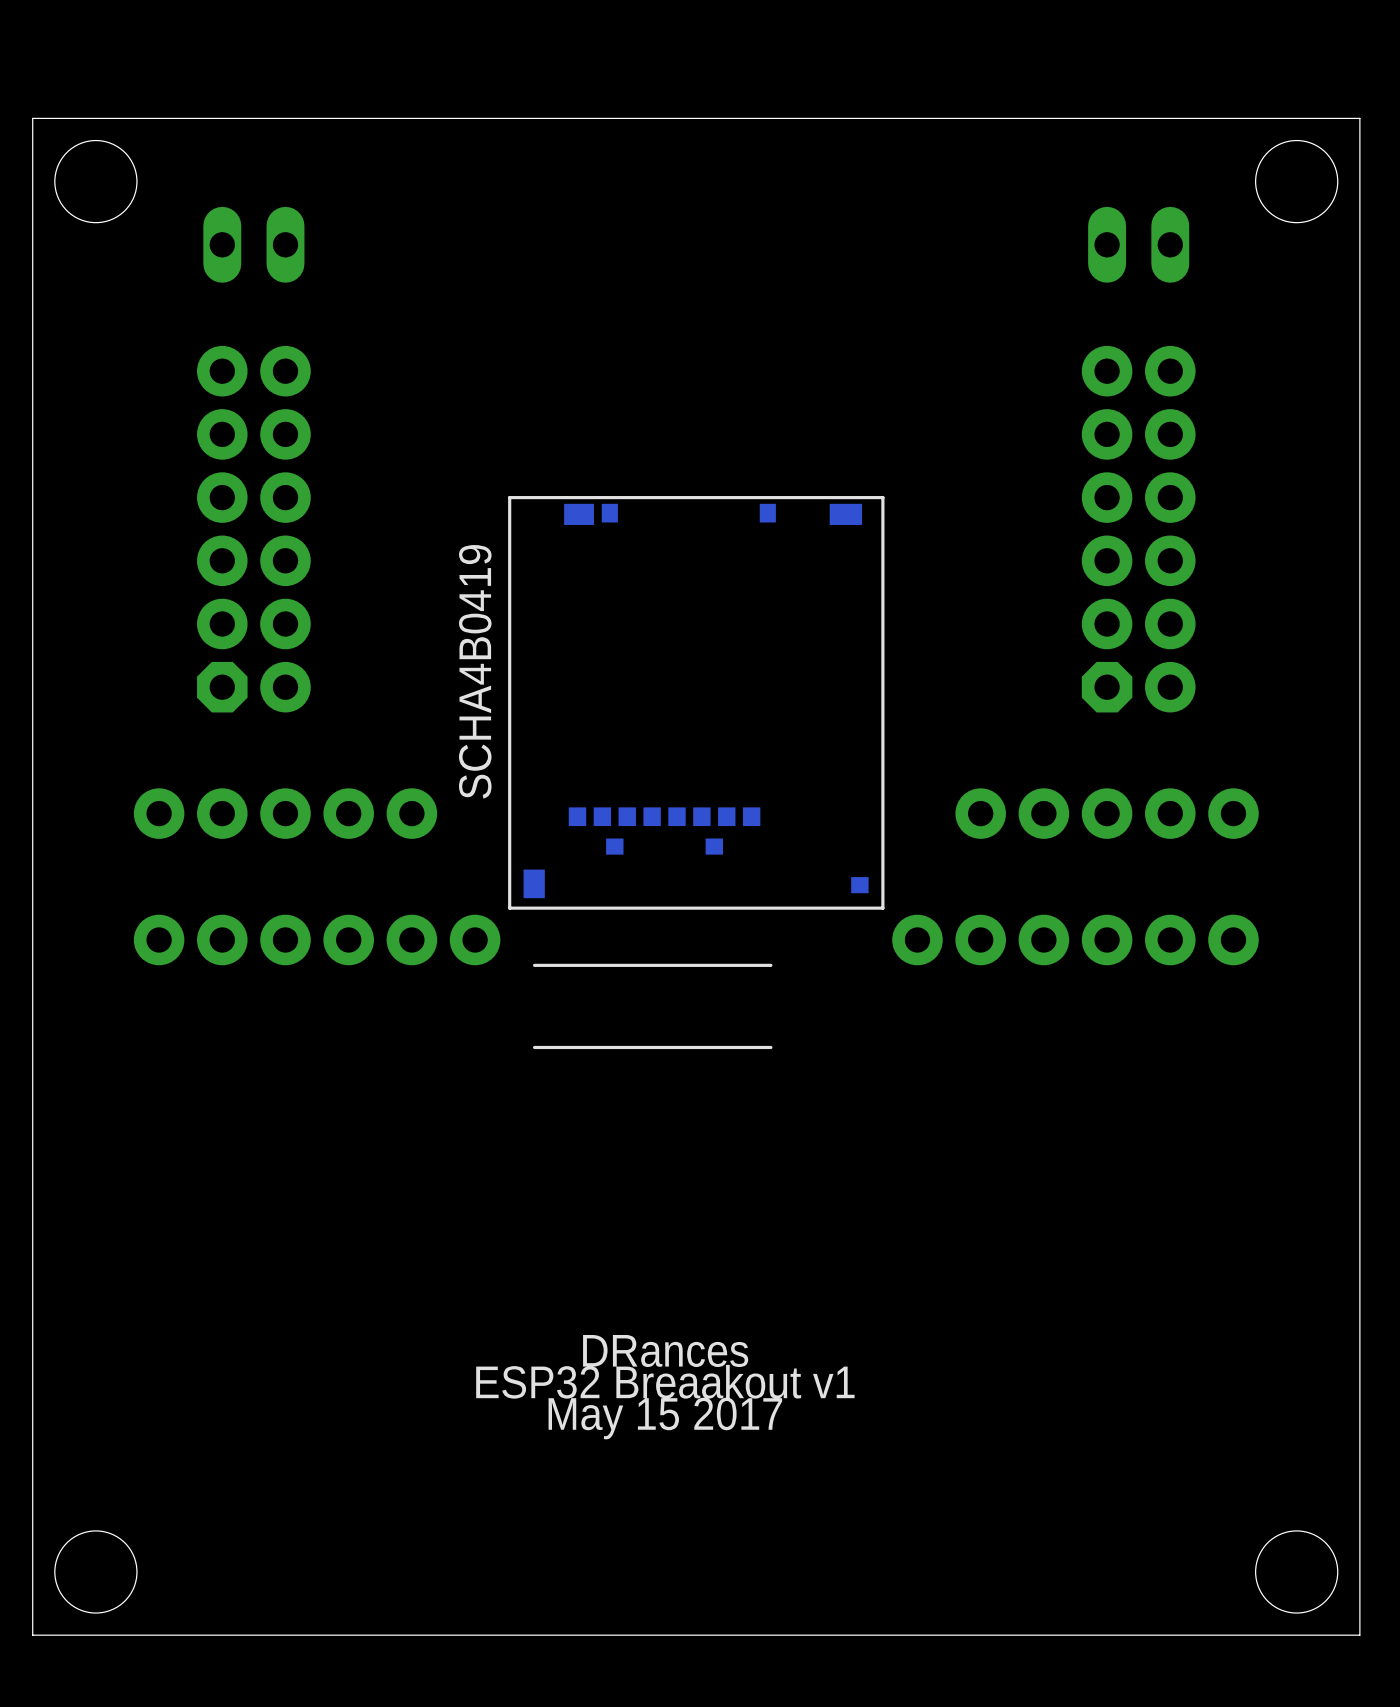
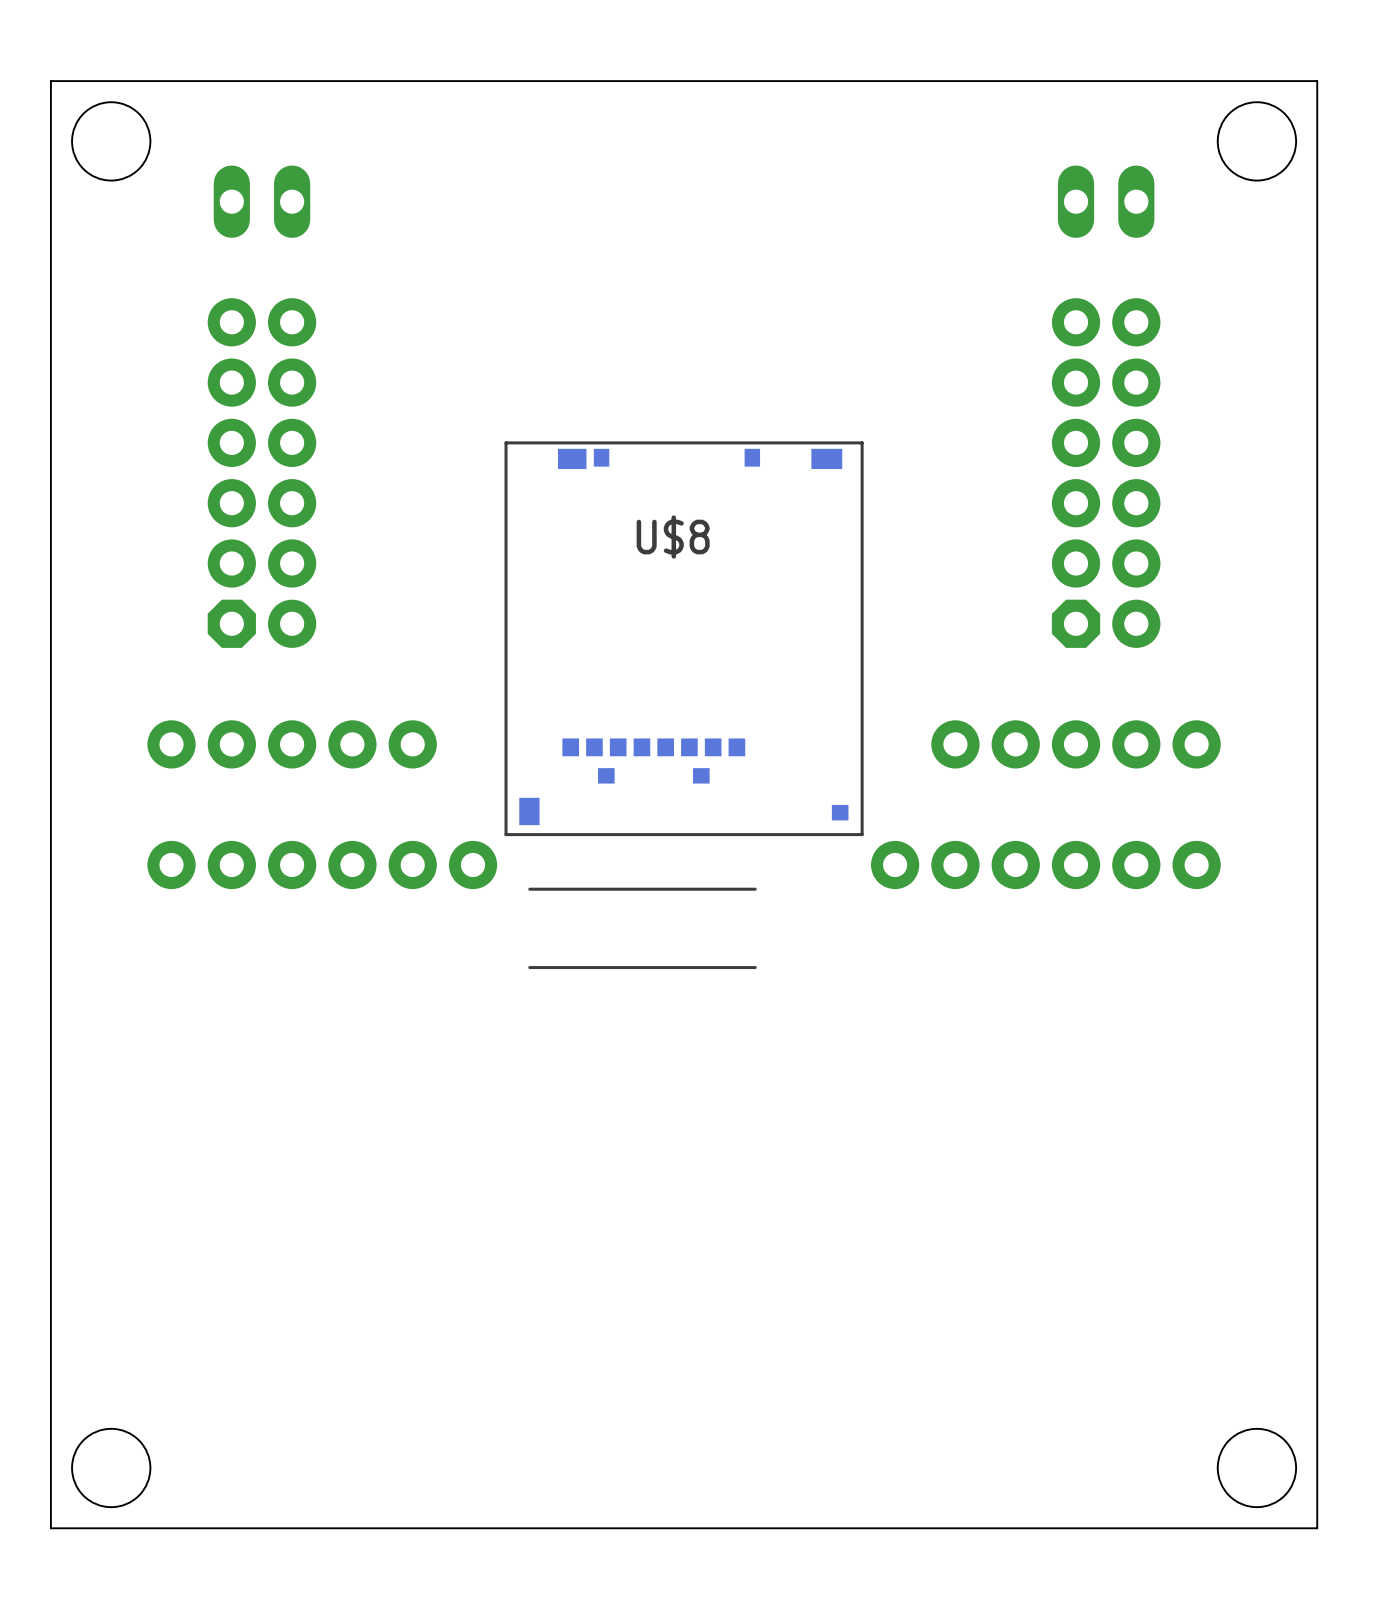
U$8 name: none -> U$8 (673, 537)
U$8 value: SCHA4B0419 (475, 671) -> none
text: DRances (665, 1351) -> none
text: ESP32 Breaakout v1 (665, 1381) -> none
text: May 15 2017 (665, 1418) -> none

